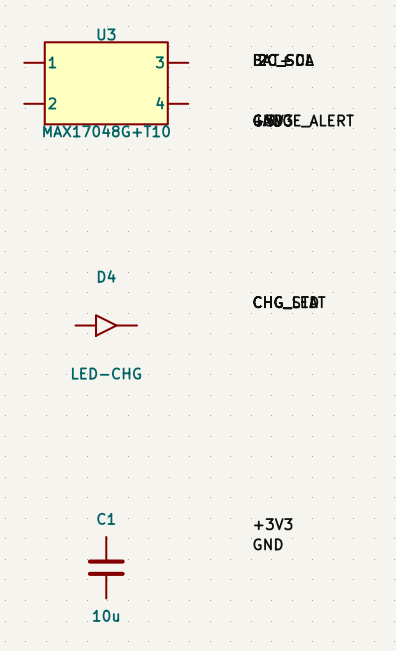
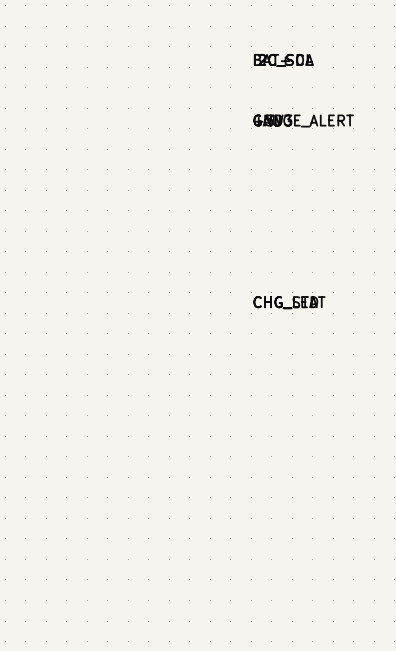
U3: MAX17048G+T10 (106, 83) -> none
D4: LED-CHG (106, 325) -> none
label: +3V3 (273, 524) -> none
label: GND (268, 544) -> none
C1: 10u (106, 567) -> none

